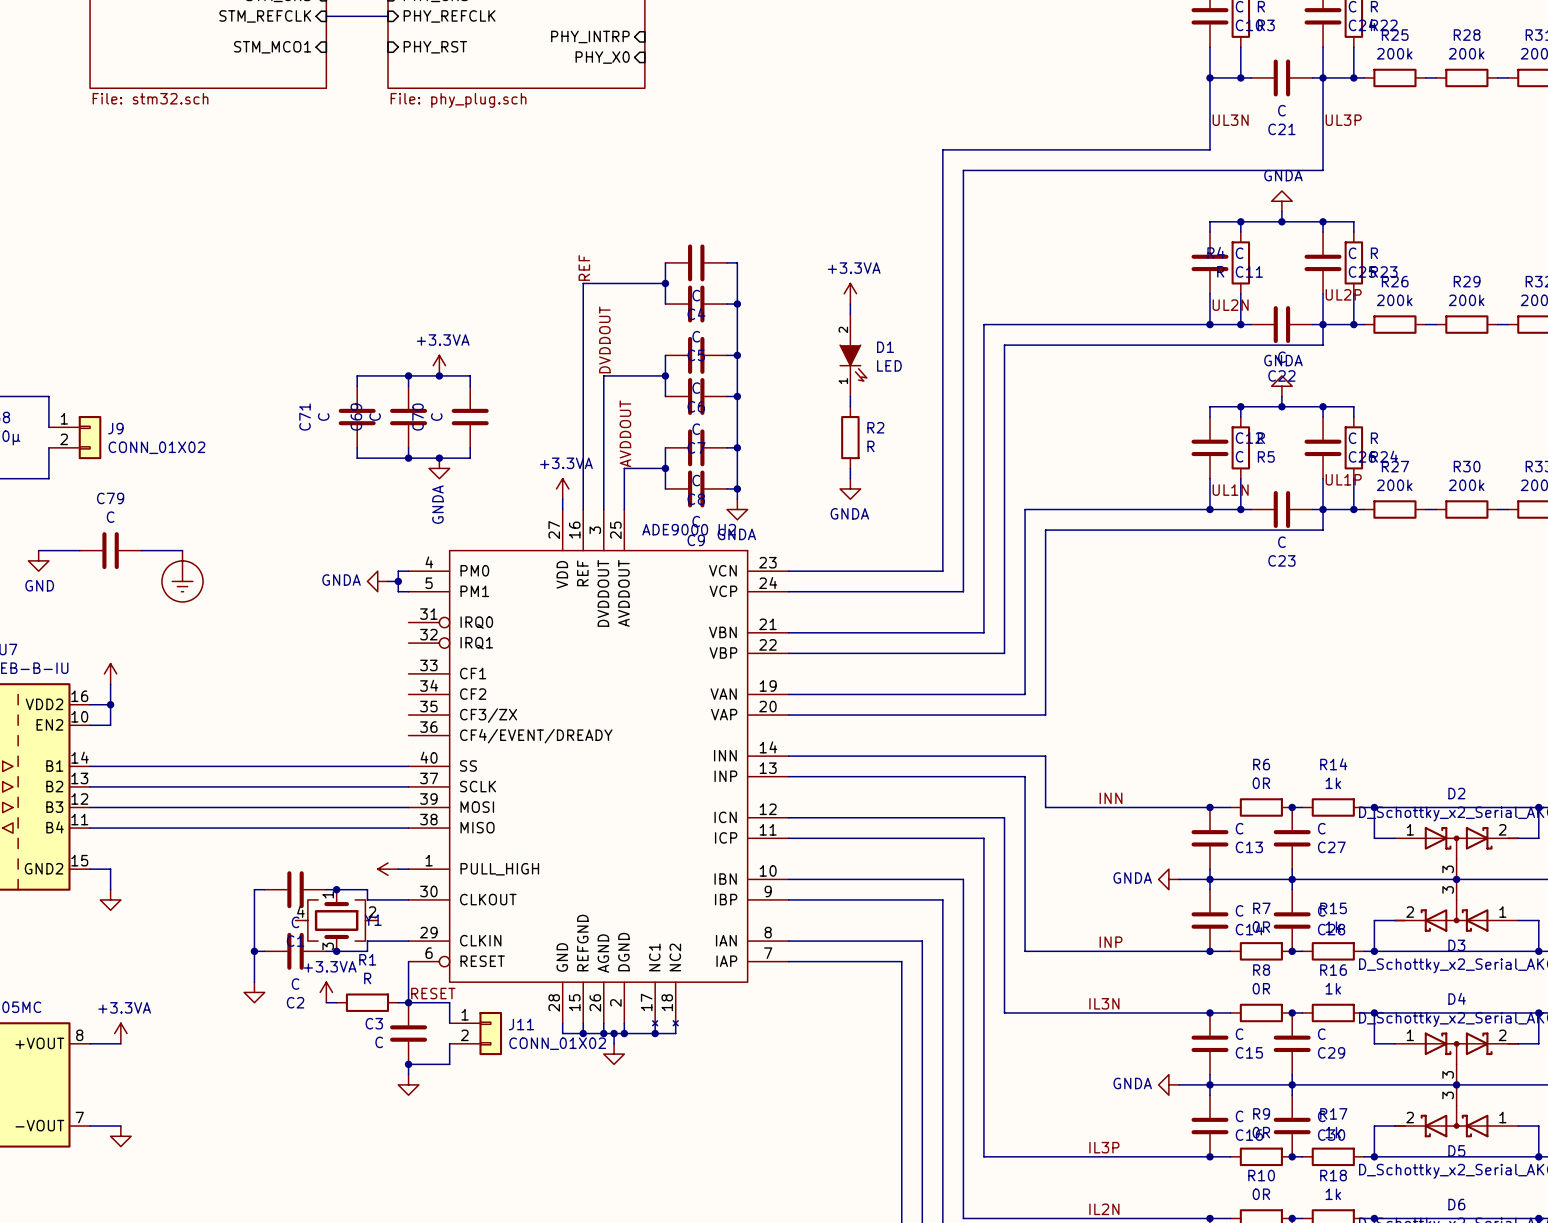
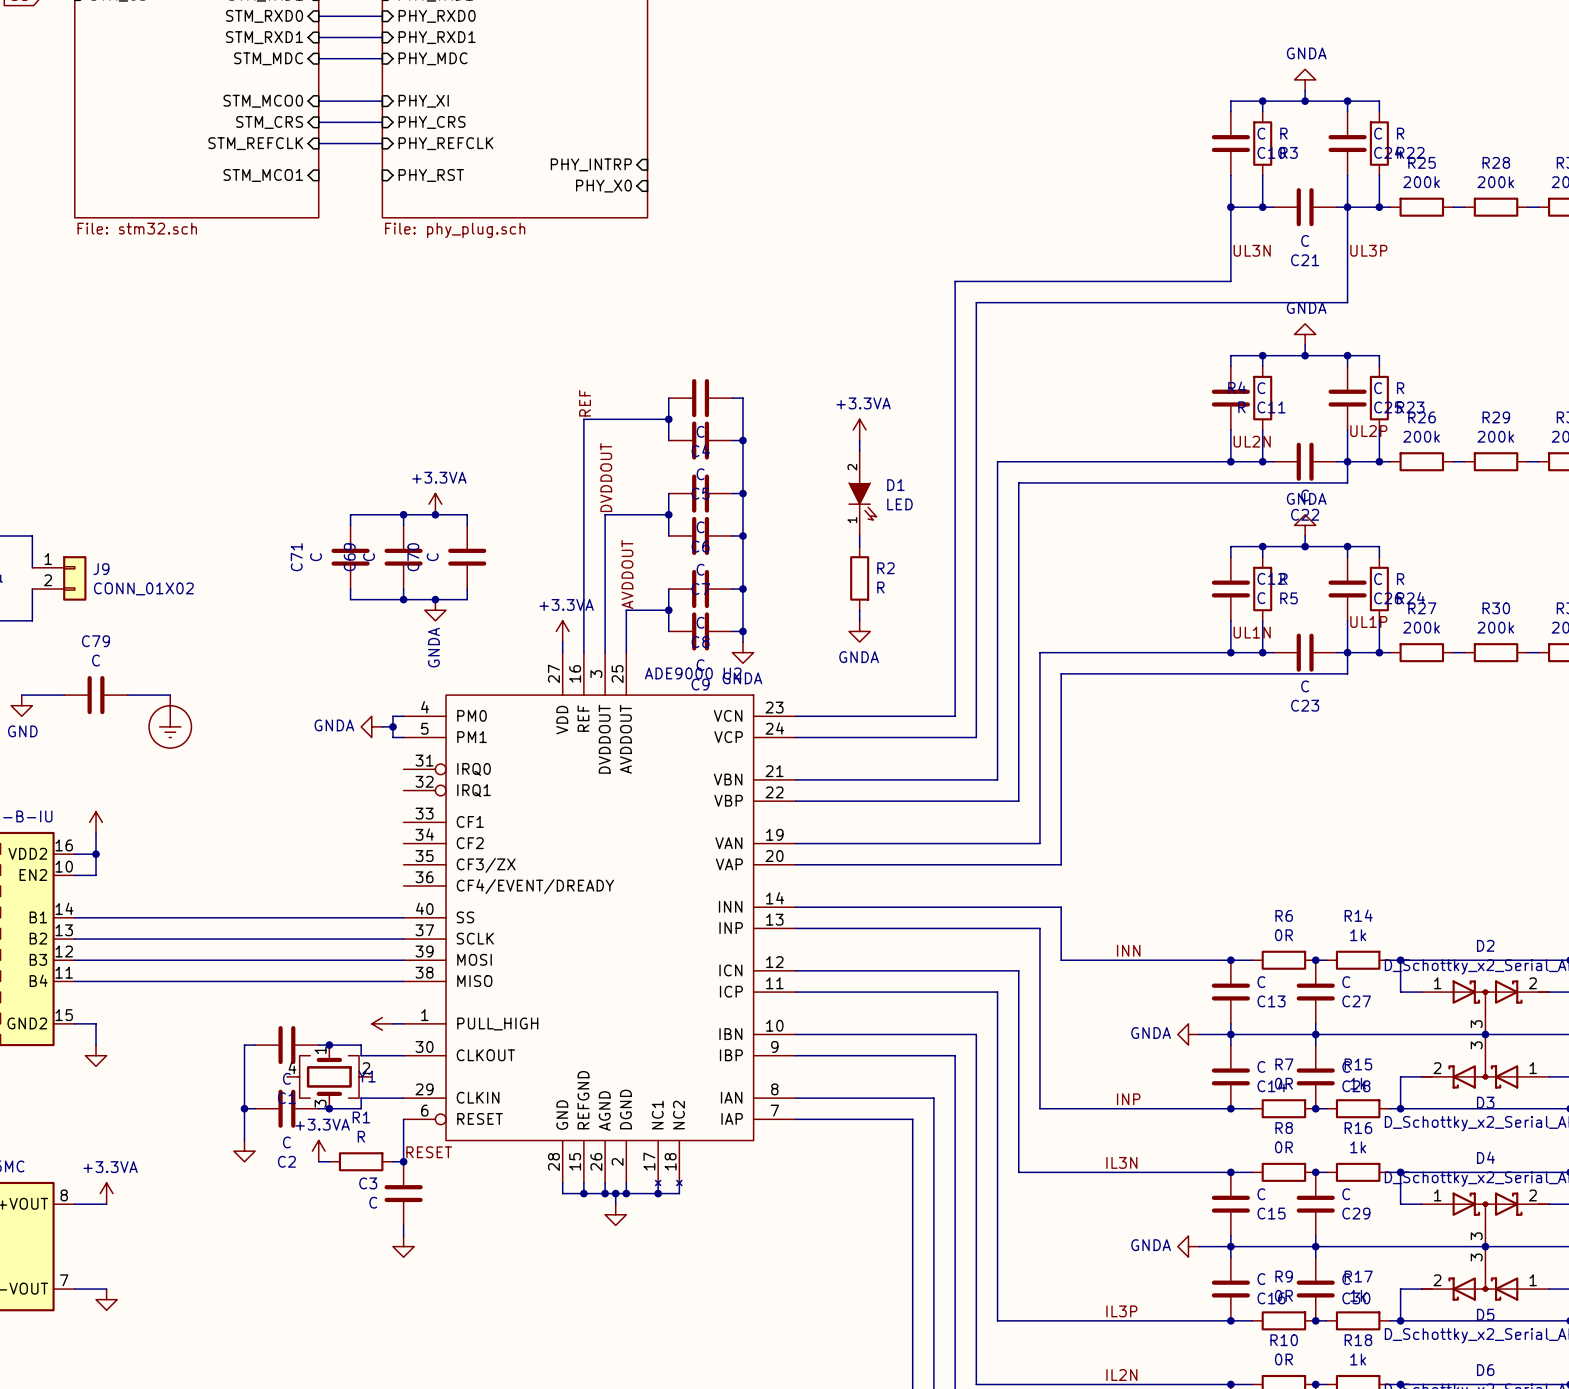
wire: (408, 1002) (449, 1002) (449, 1023) -> none
J11: CONN_01X02 (475, 1033) -> none
wire: (449, 1043) (449, 1064) (408, 1064) -> none
junction: (408, 1064) -> none

